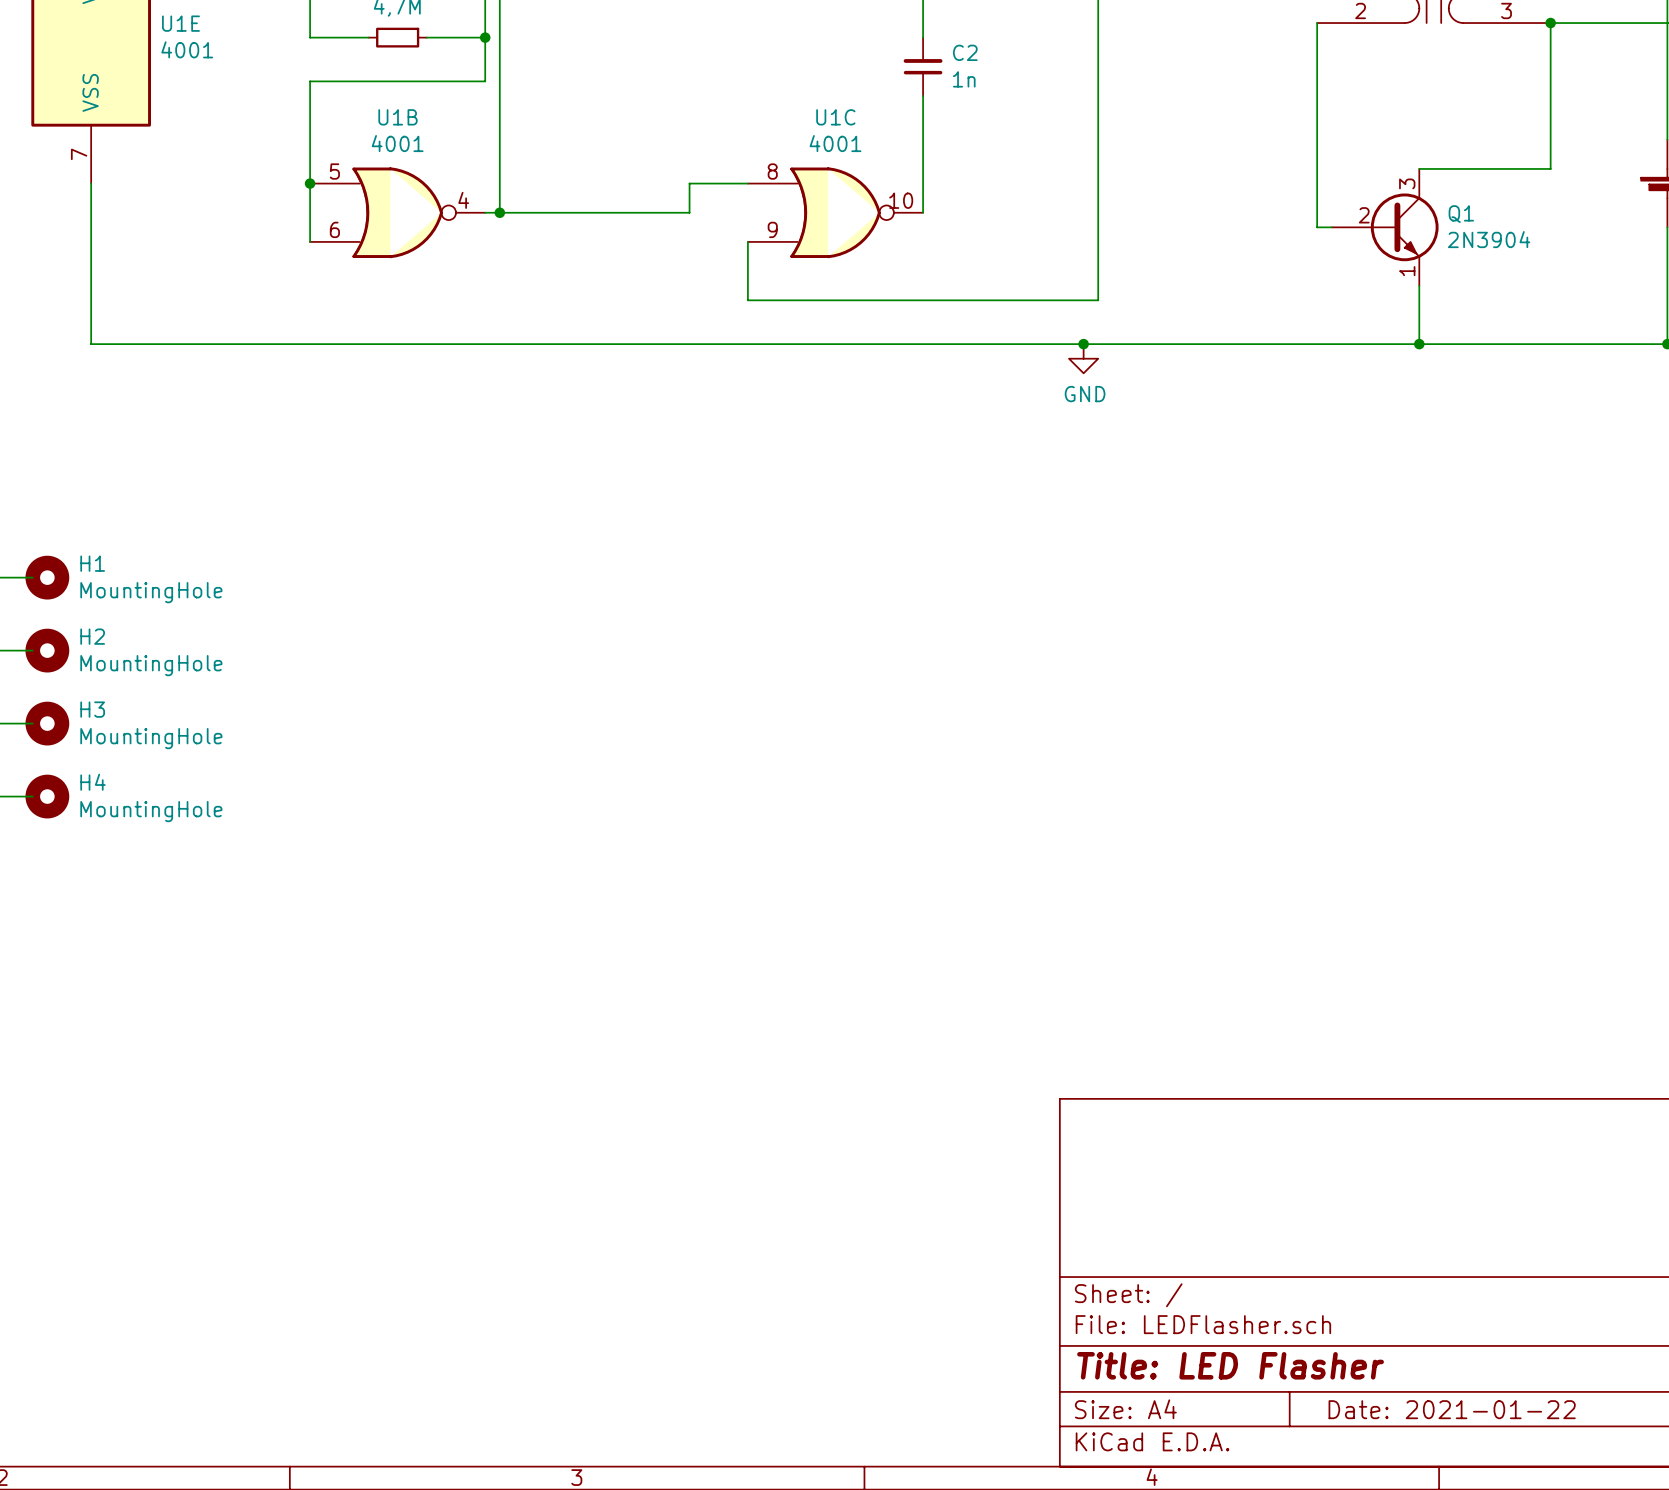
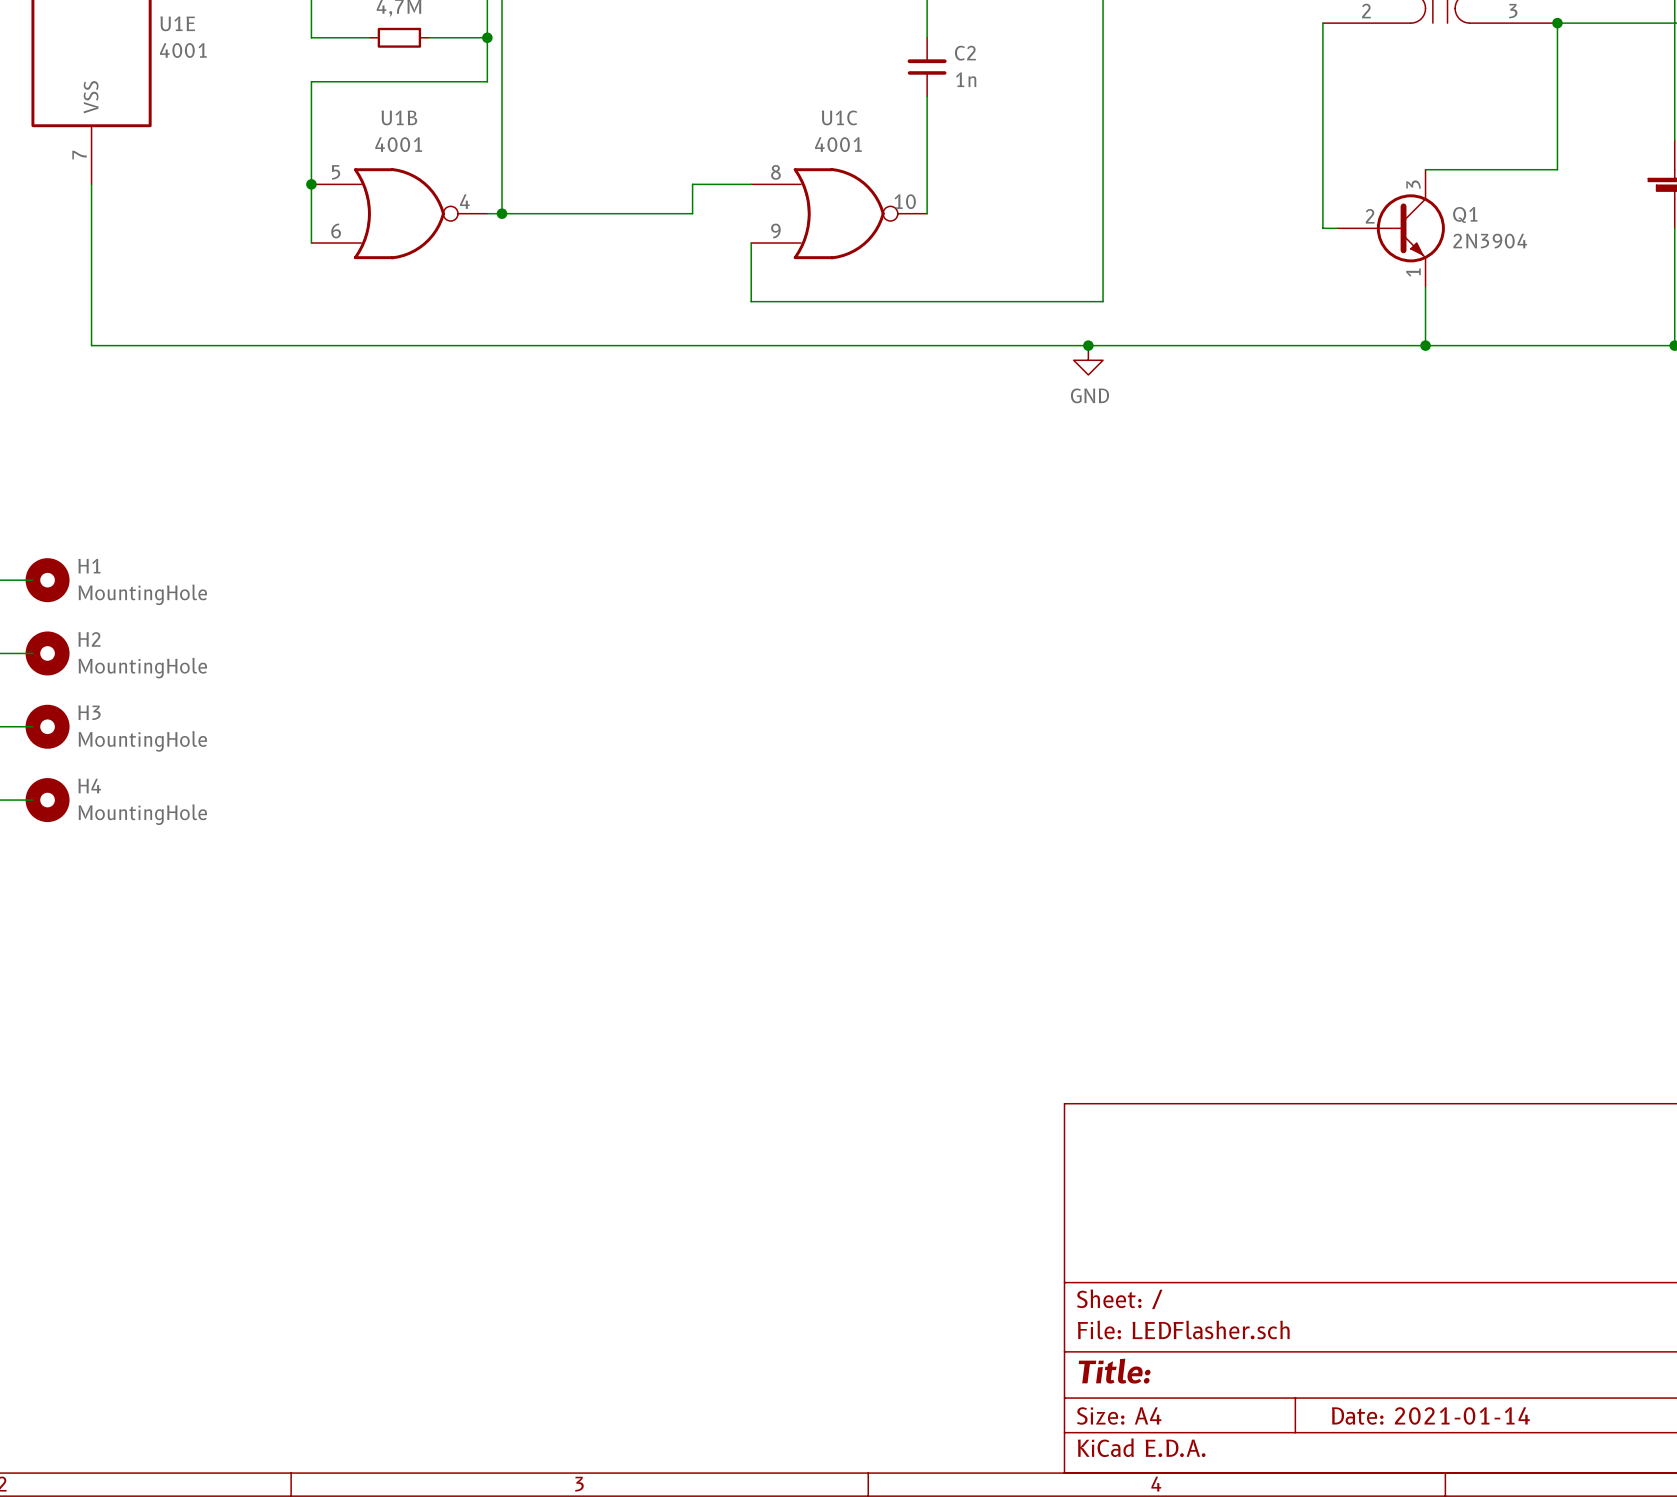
title block: Title: LED Flasher (1230, 1365) -> Title: (1114, 1371)
title block: Date: 2021-01-22 (1452, 1409) -> Date: 2021-01-14 (1430, 1415)

